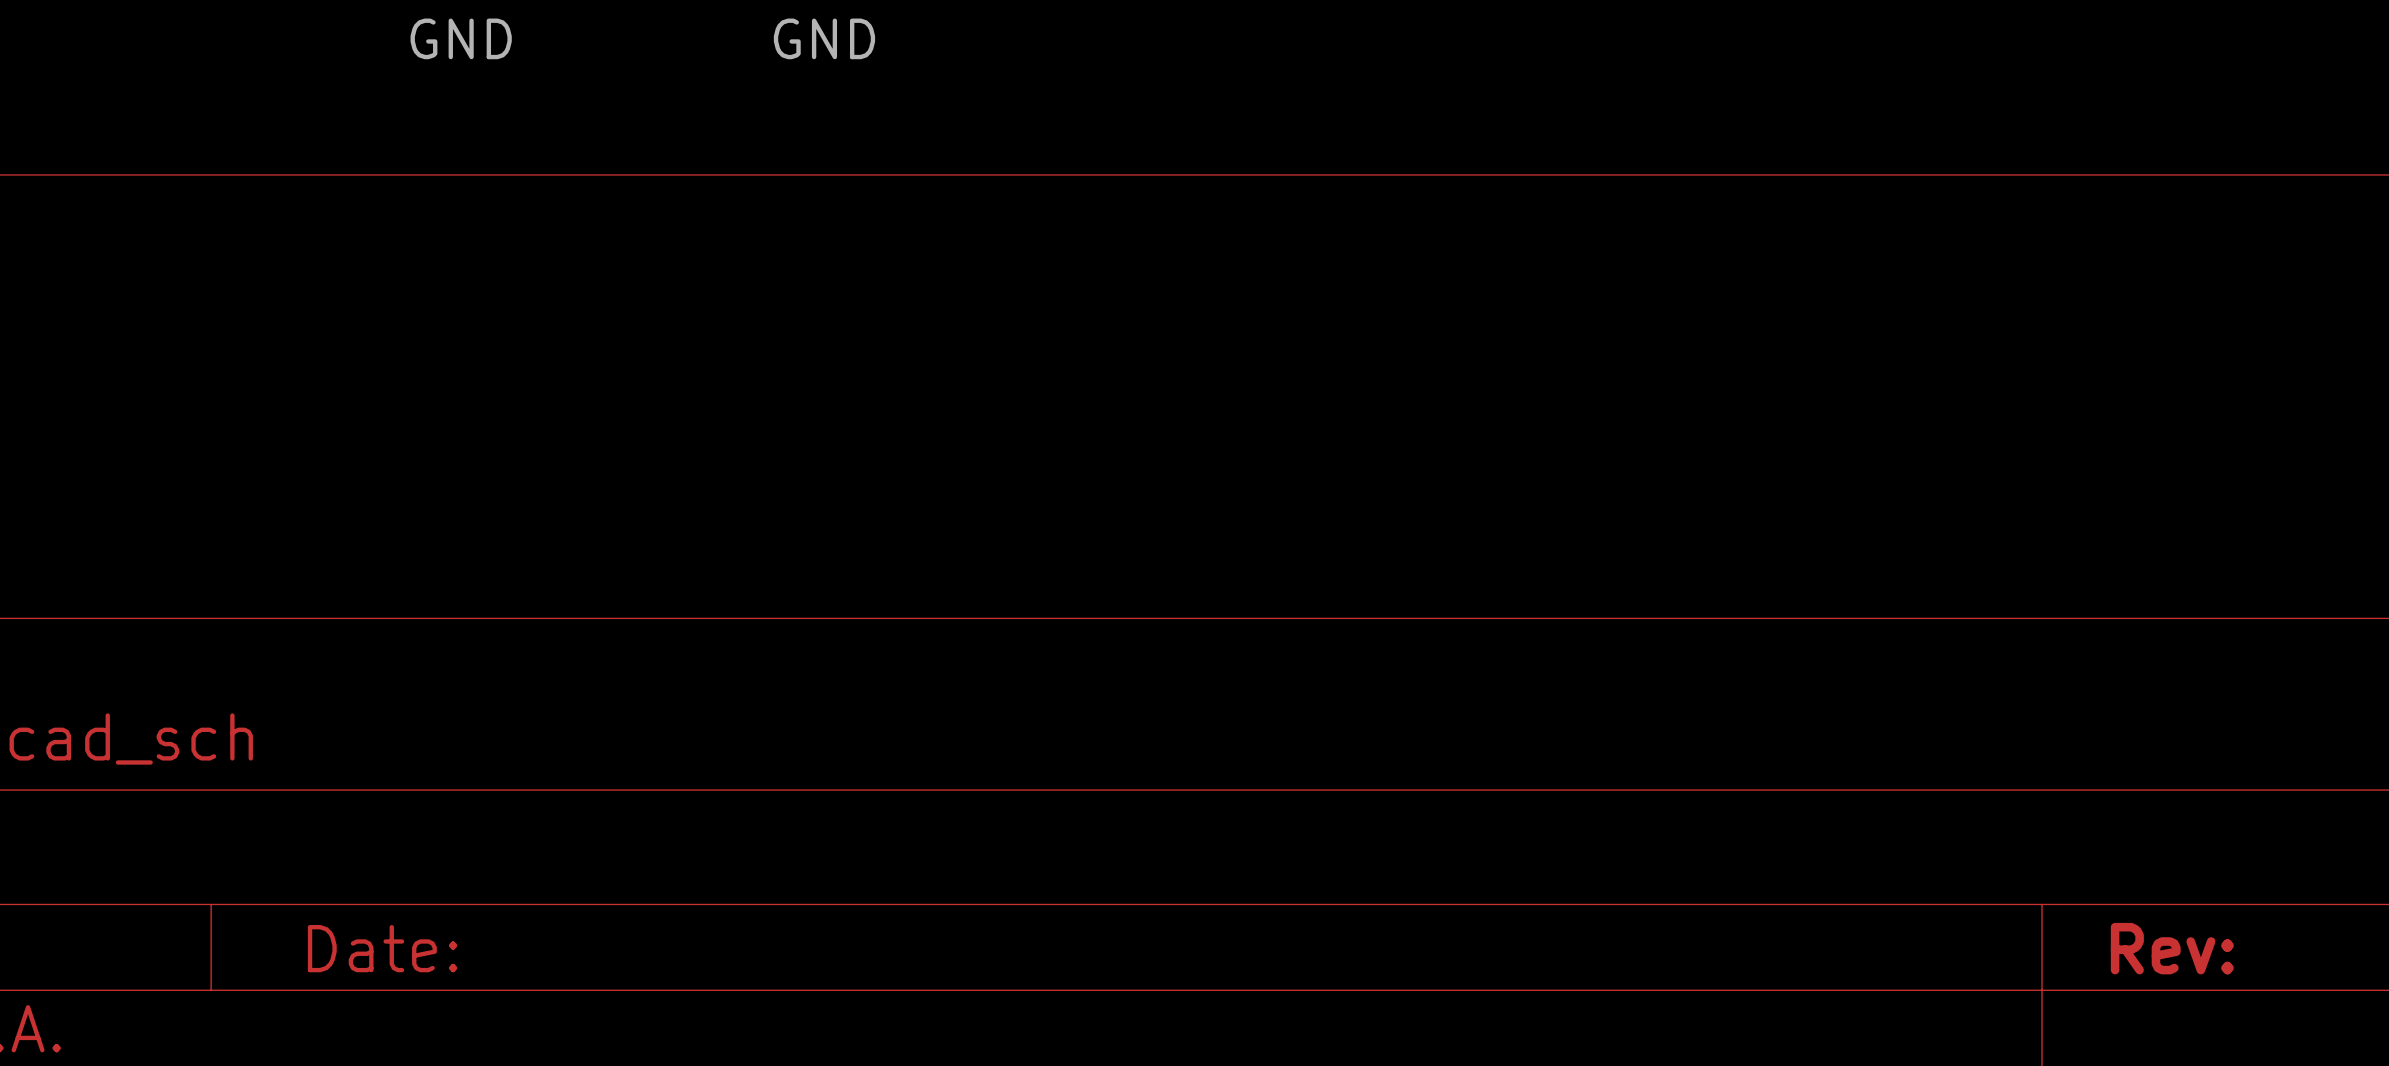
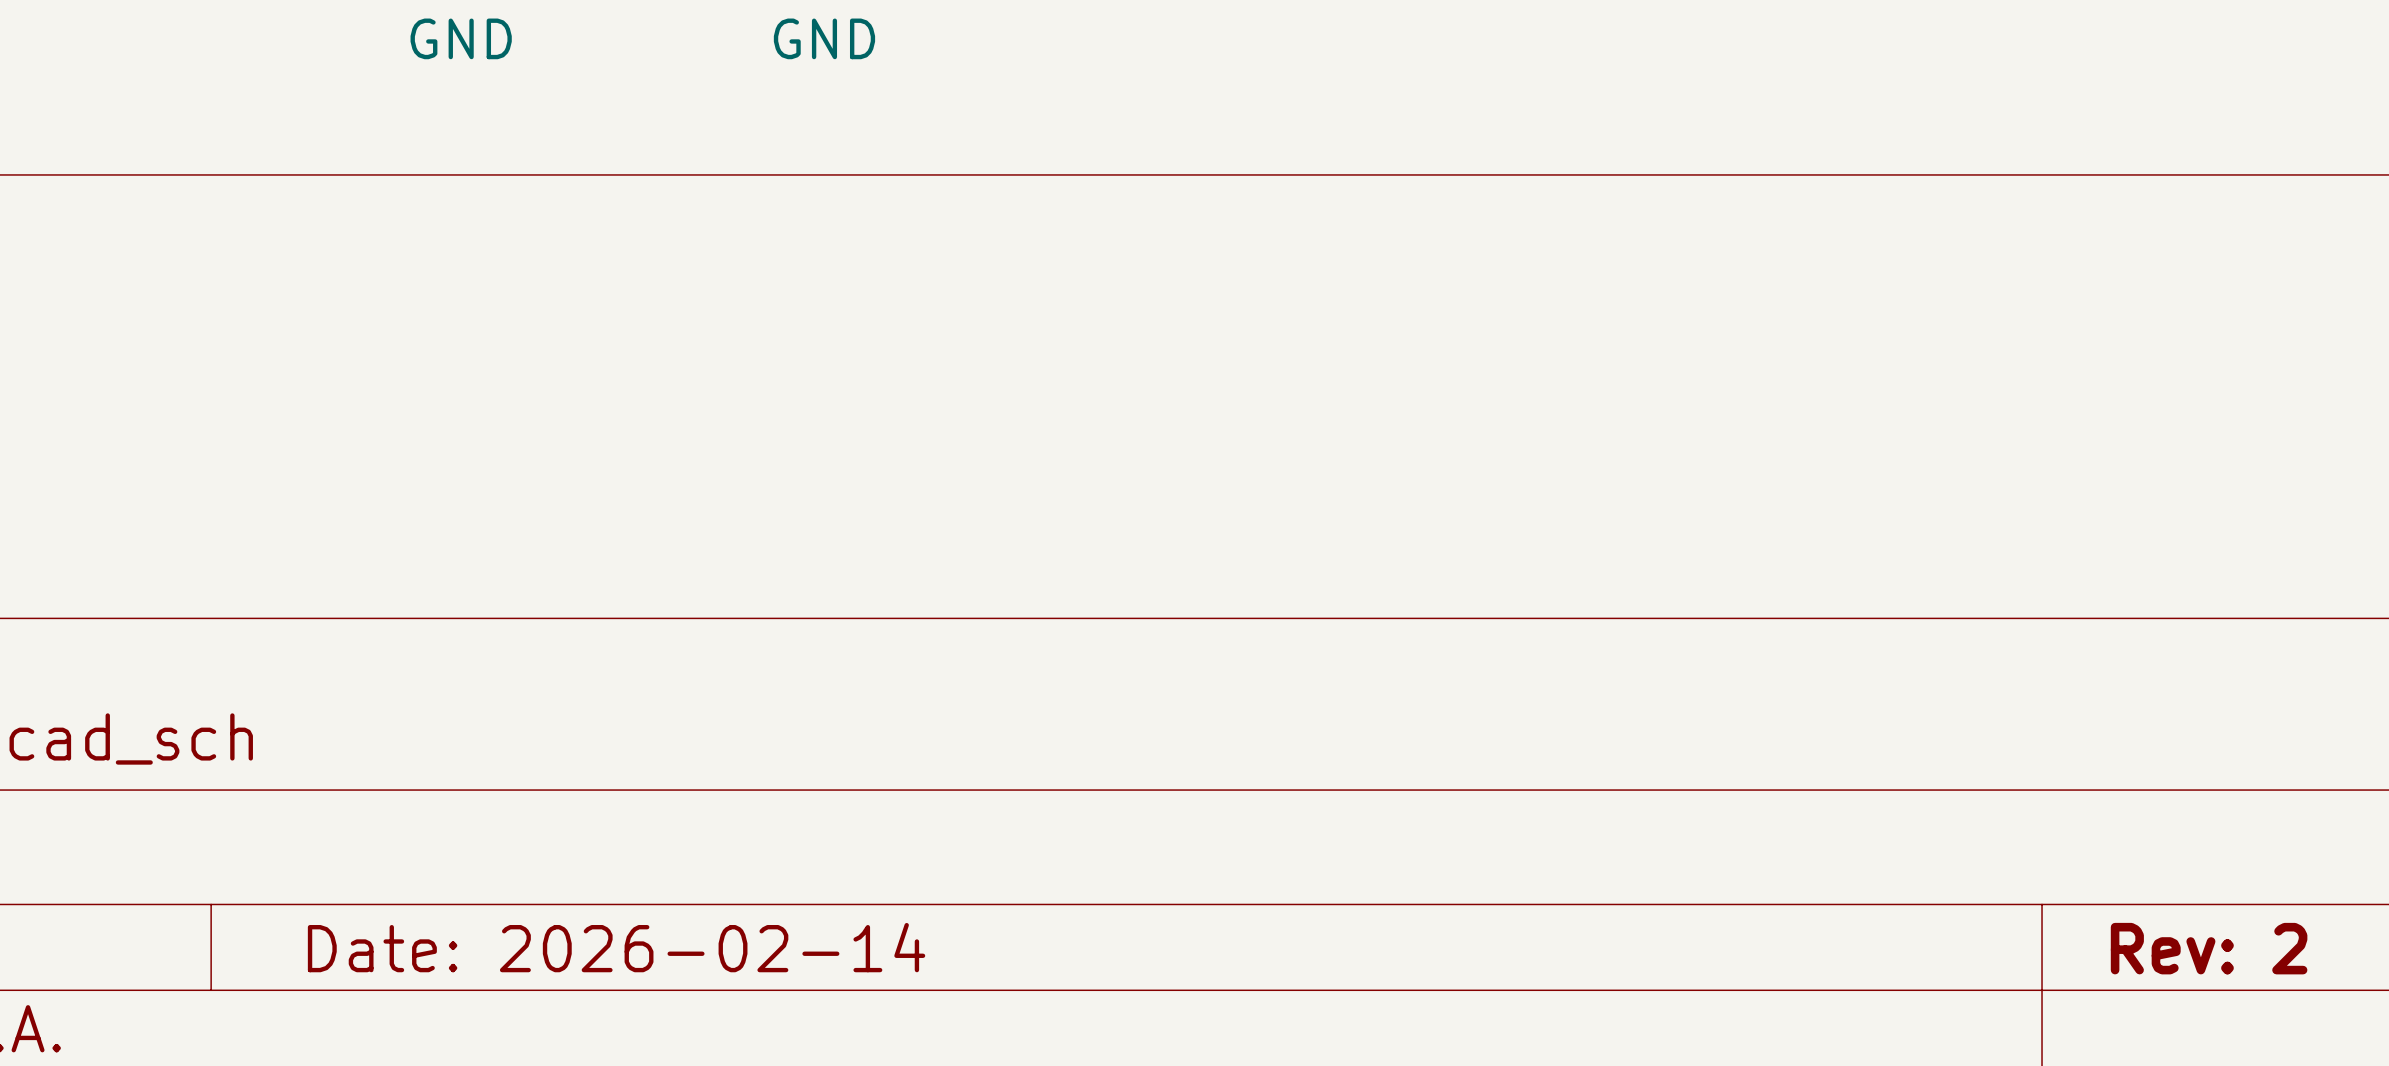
title block: Date: (382, 948) -> Date: 2026-02-14 (616, 947)
title block: Rev: (2172, 948) -> Rev: 2 (2209, 948)

